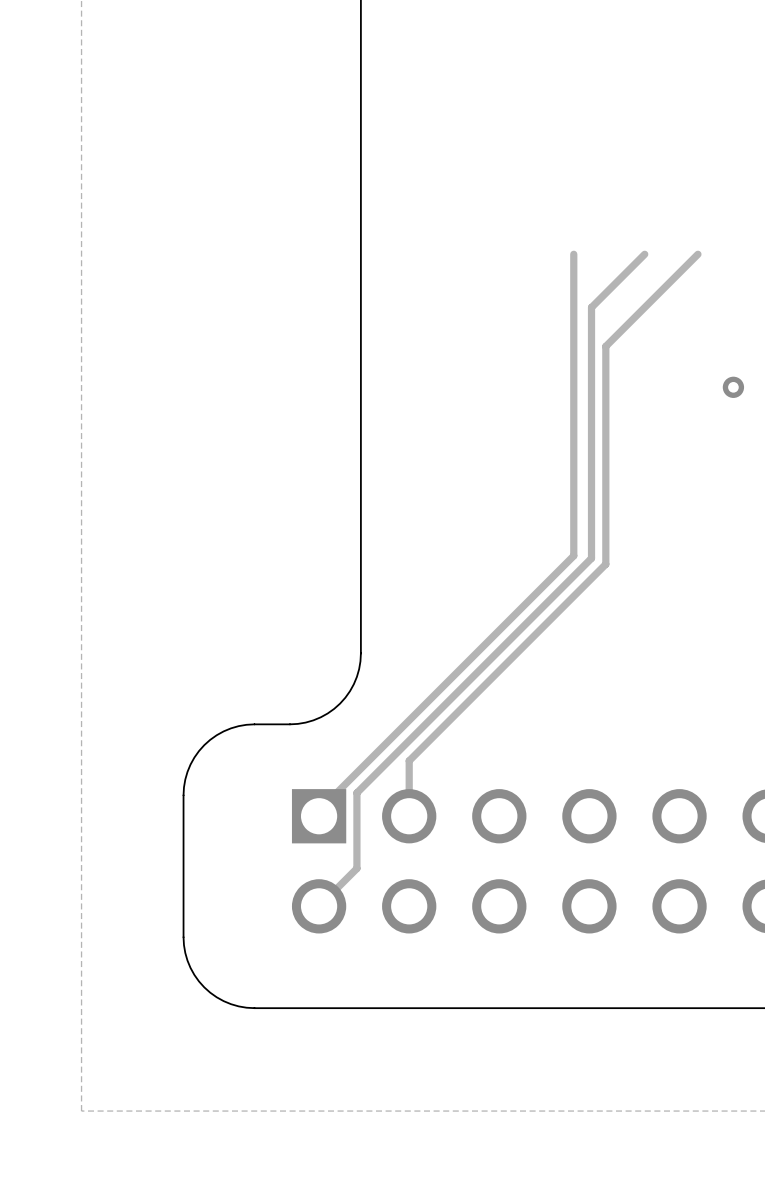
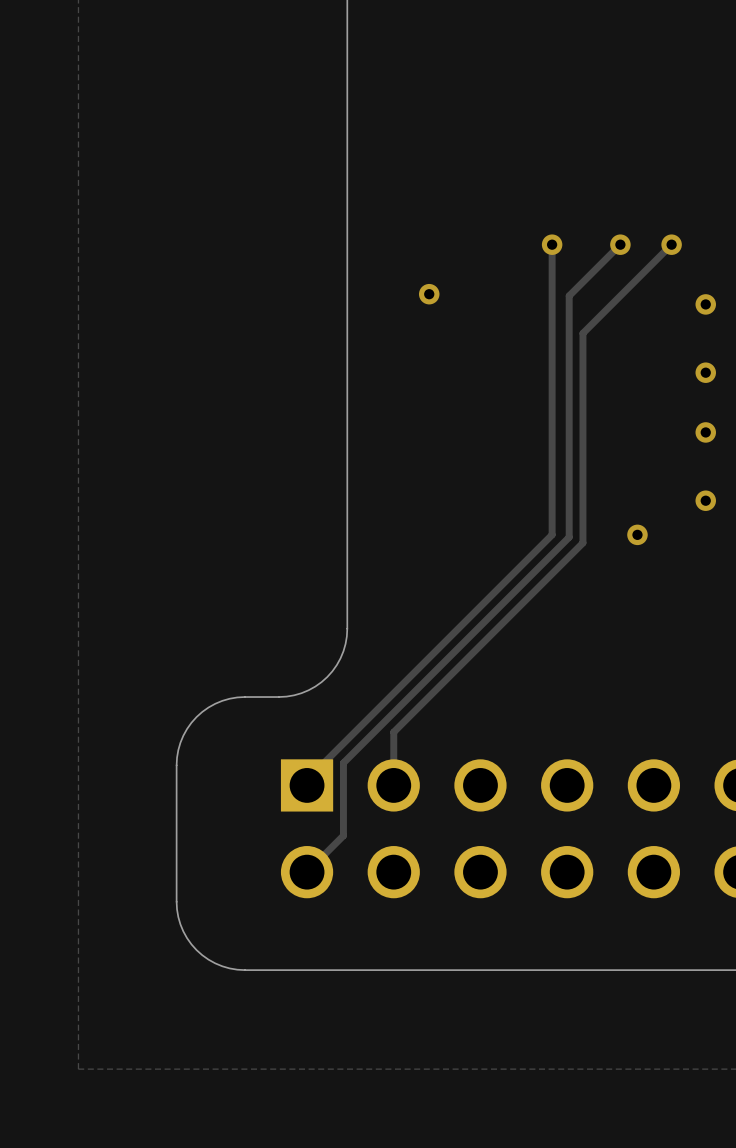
via: none -> (552, 244)
via: none -> (620, 244)
via: none -> (671, 244)
via: none -> (429, 294)
via: none -> (705, 304)
via: none -> (705, 432)
via: none -> (705, 500)
via: none -> (637, 534)

